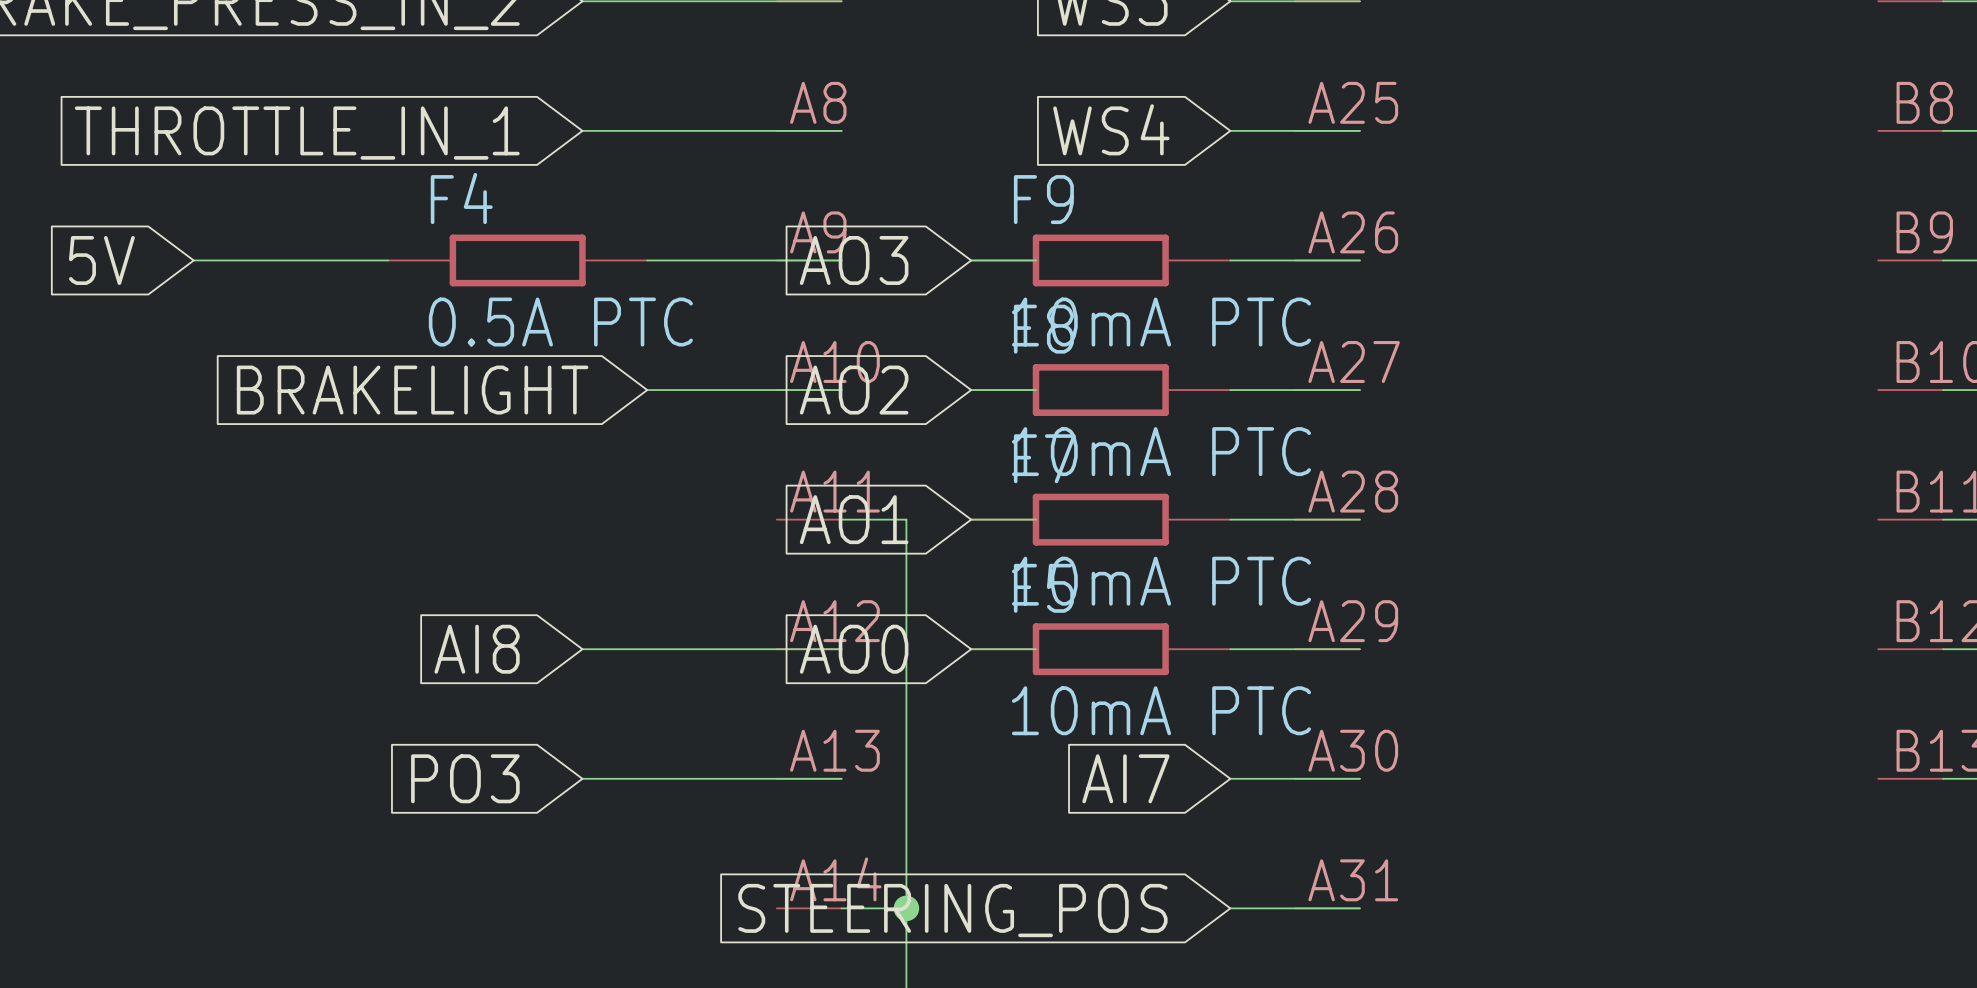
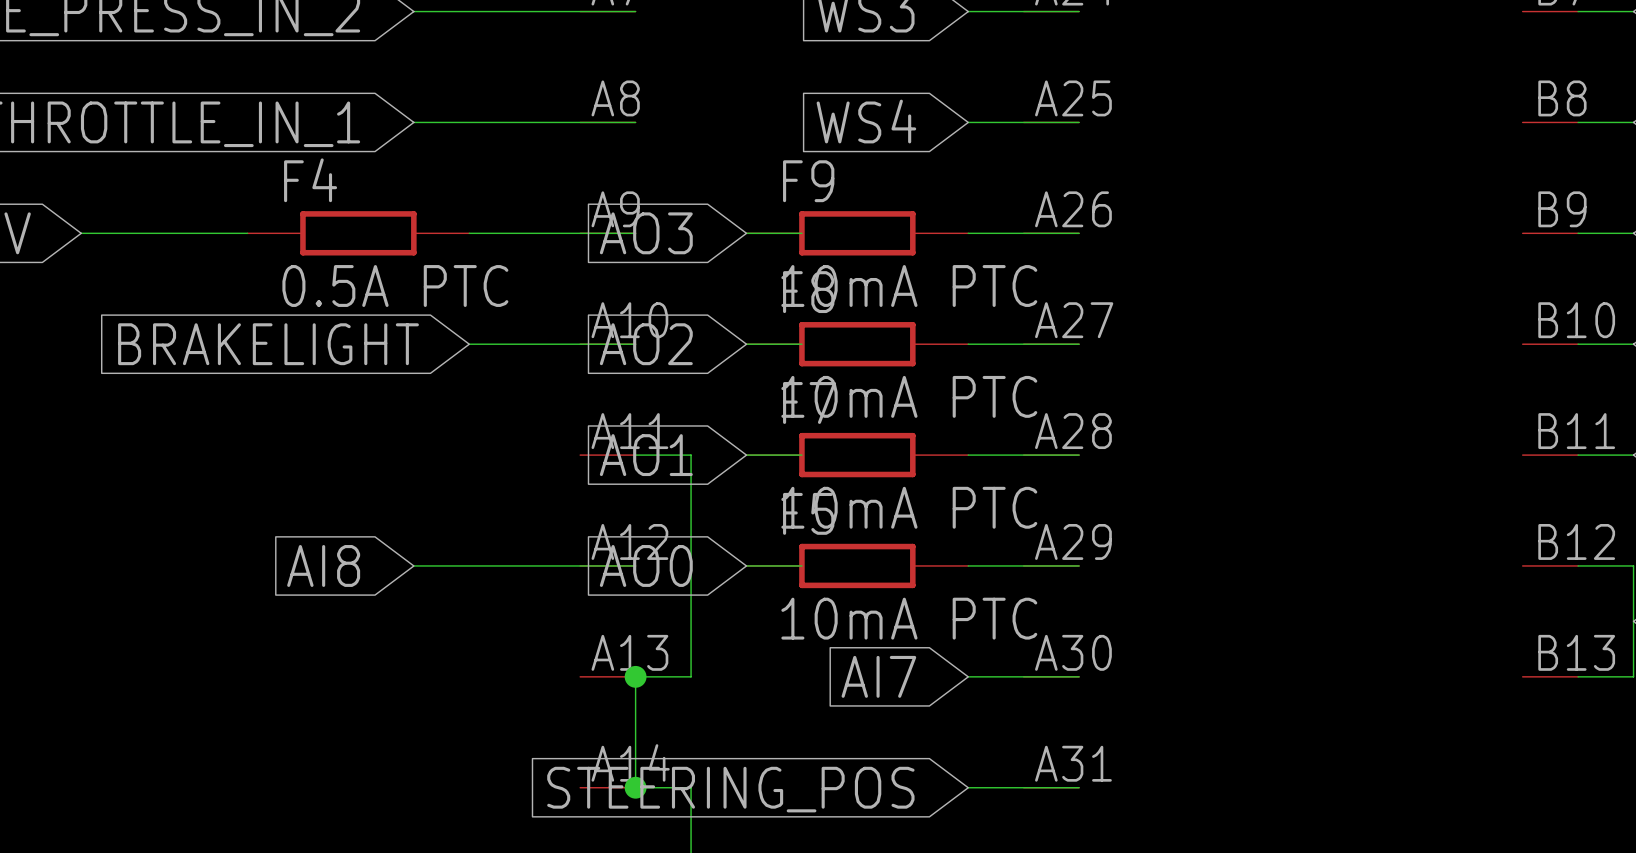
global label: PO3 (465, 778) -> none
wire: (582, 778) (841, 778) -> none
junction: none -> (635, 676)
wire: (906, 778) (906, 908) -> (691, 676) (635, 676) (635, 787)
junction position: (906, 908) -> (635, 787)

